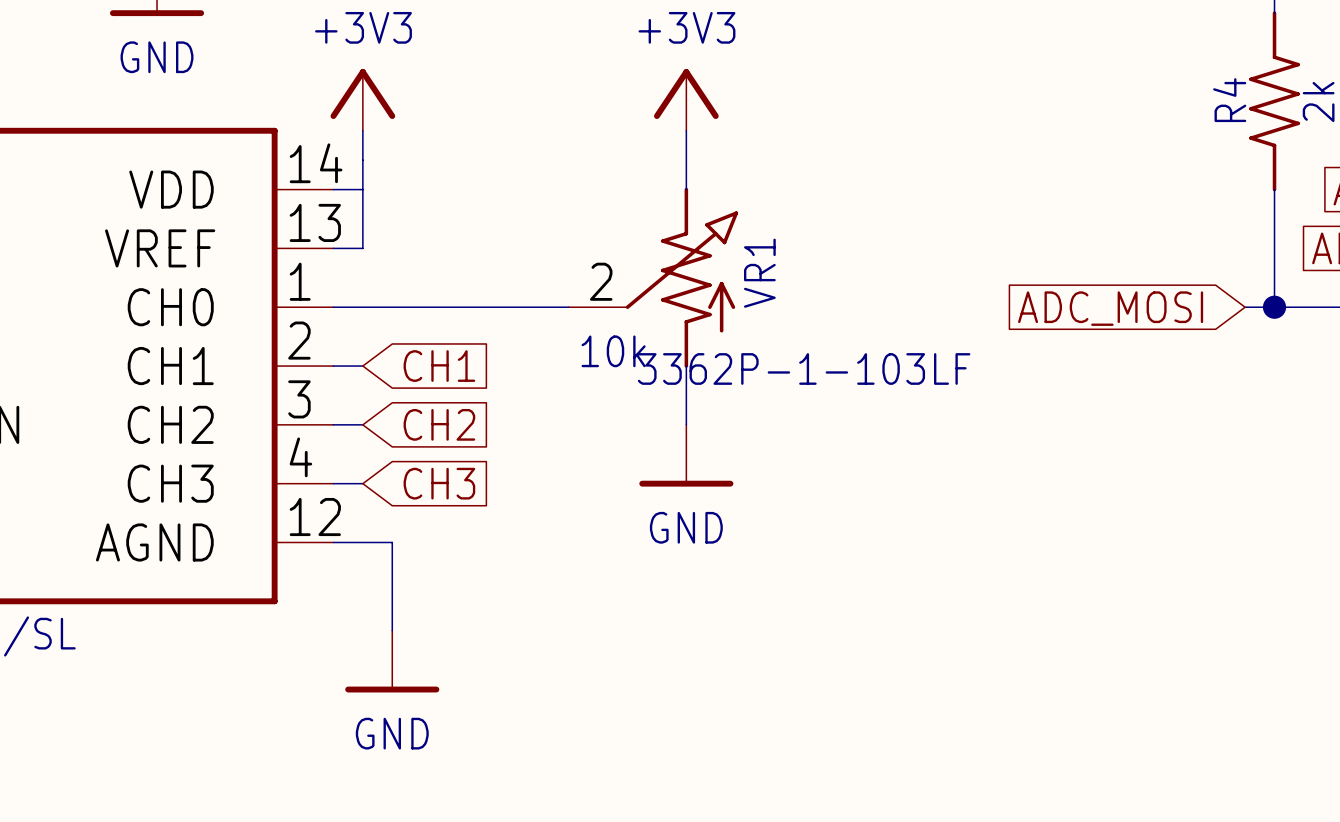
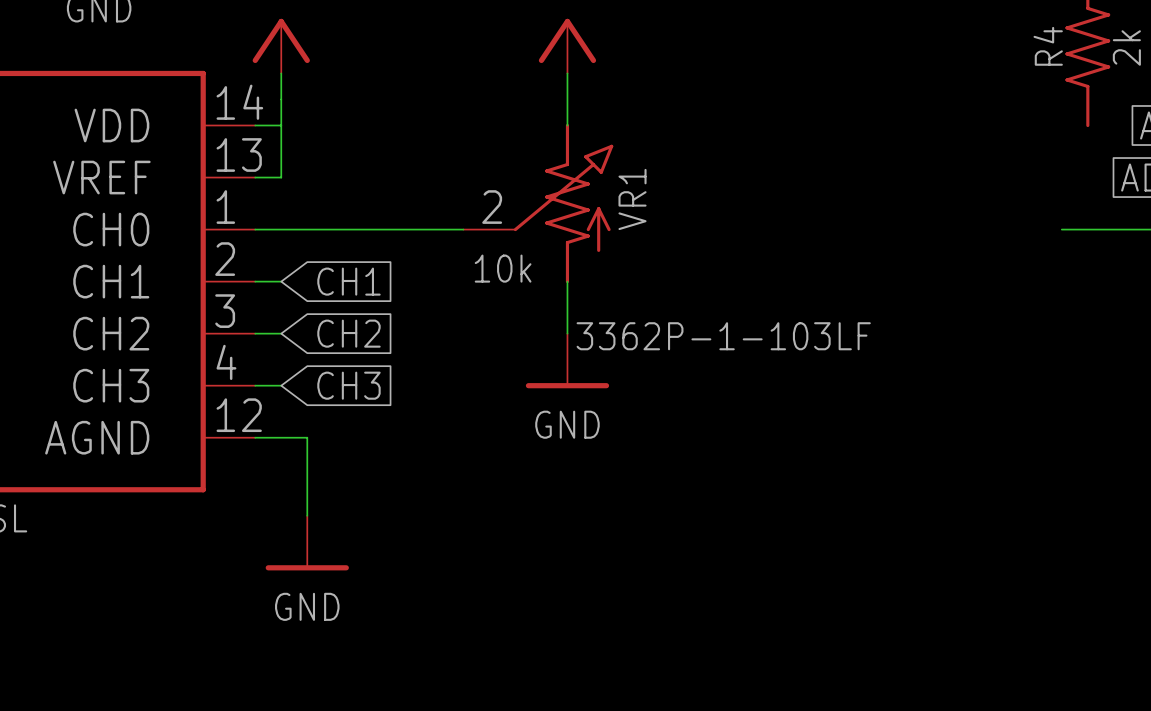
wire: (1274, 189) (1274, 307) -> none
junction: (1274, 307) -> none
global label: ADC_MOSI (1110, 308) -> none
VR1 text position: 3362P-1-103LF (804, 368) -> 3362P-1-103LF (723, 336)

